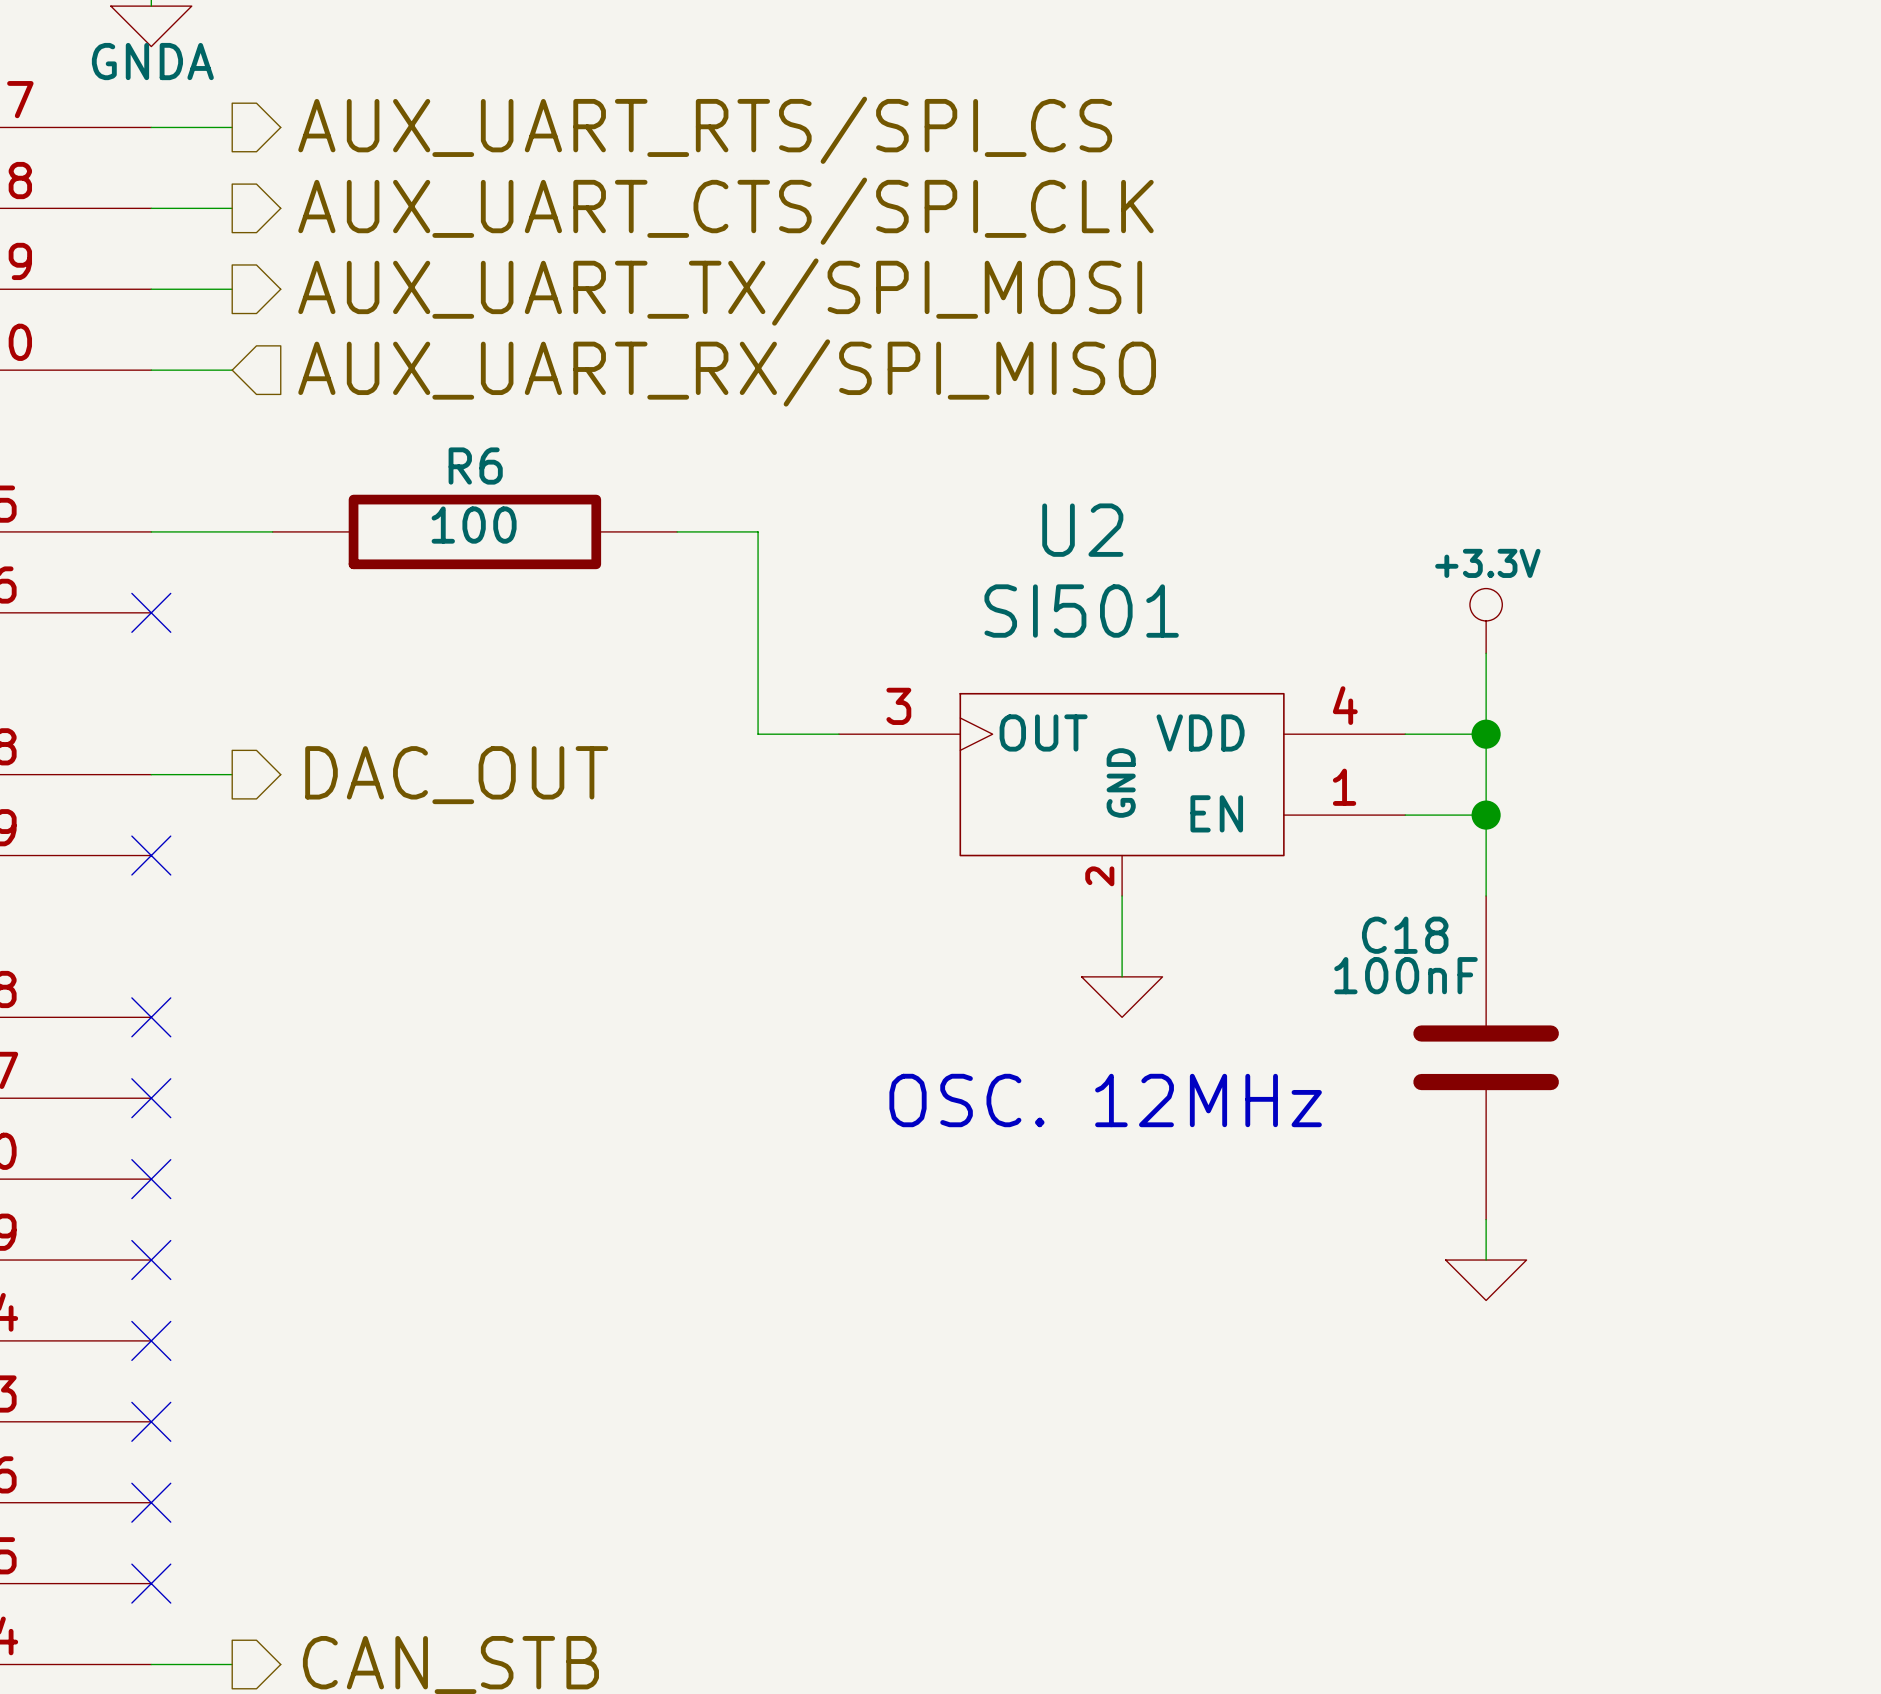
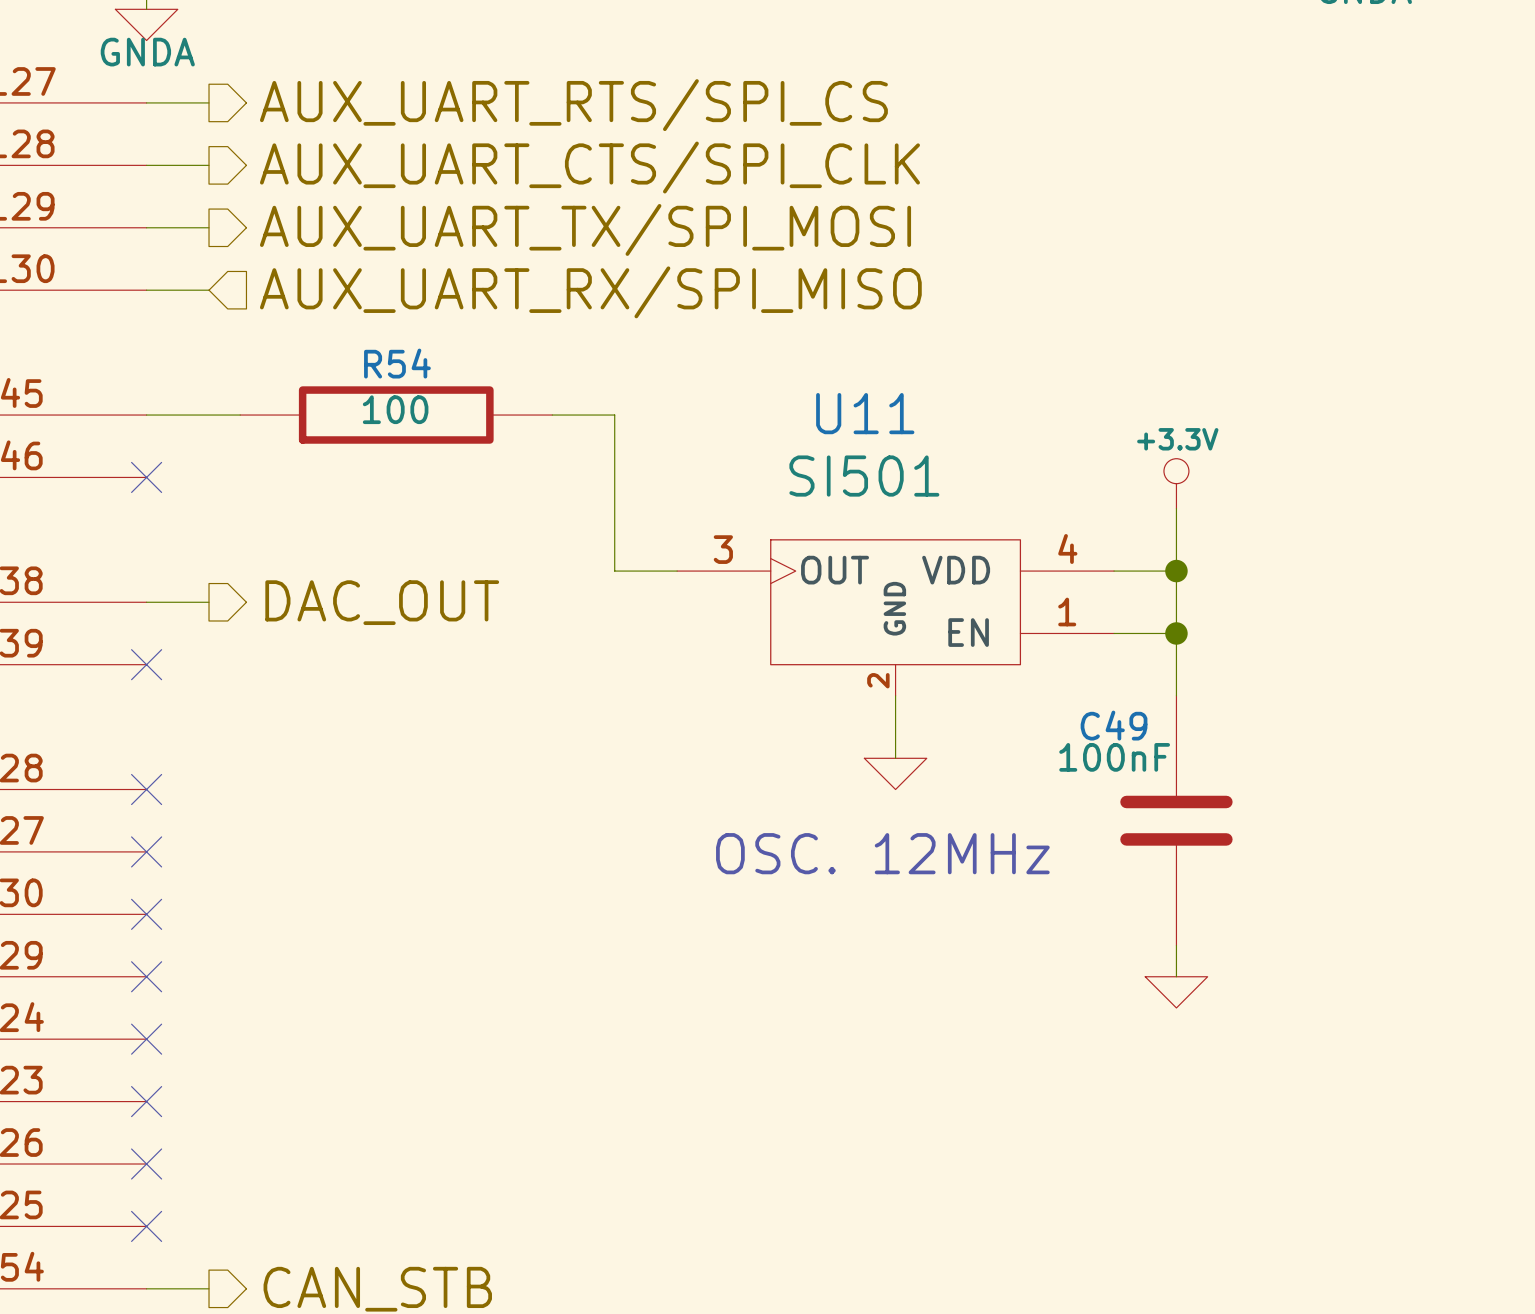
R6 name: R6 (475, 466) -> R54 (397, 363)
U2 name: U2 (1082, 530) -> U11 (865, 413)
C18 name: C18 (1405, 935) -> C49 (1114, 725)

